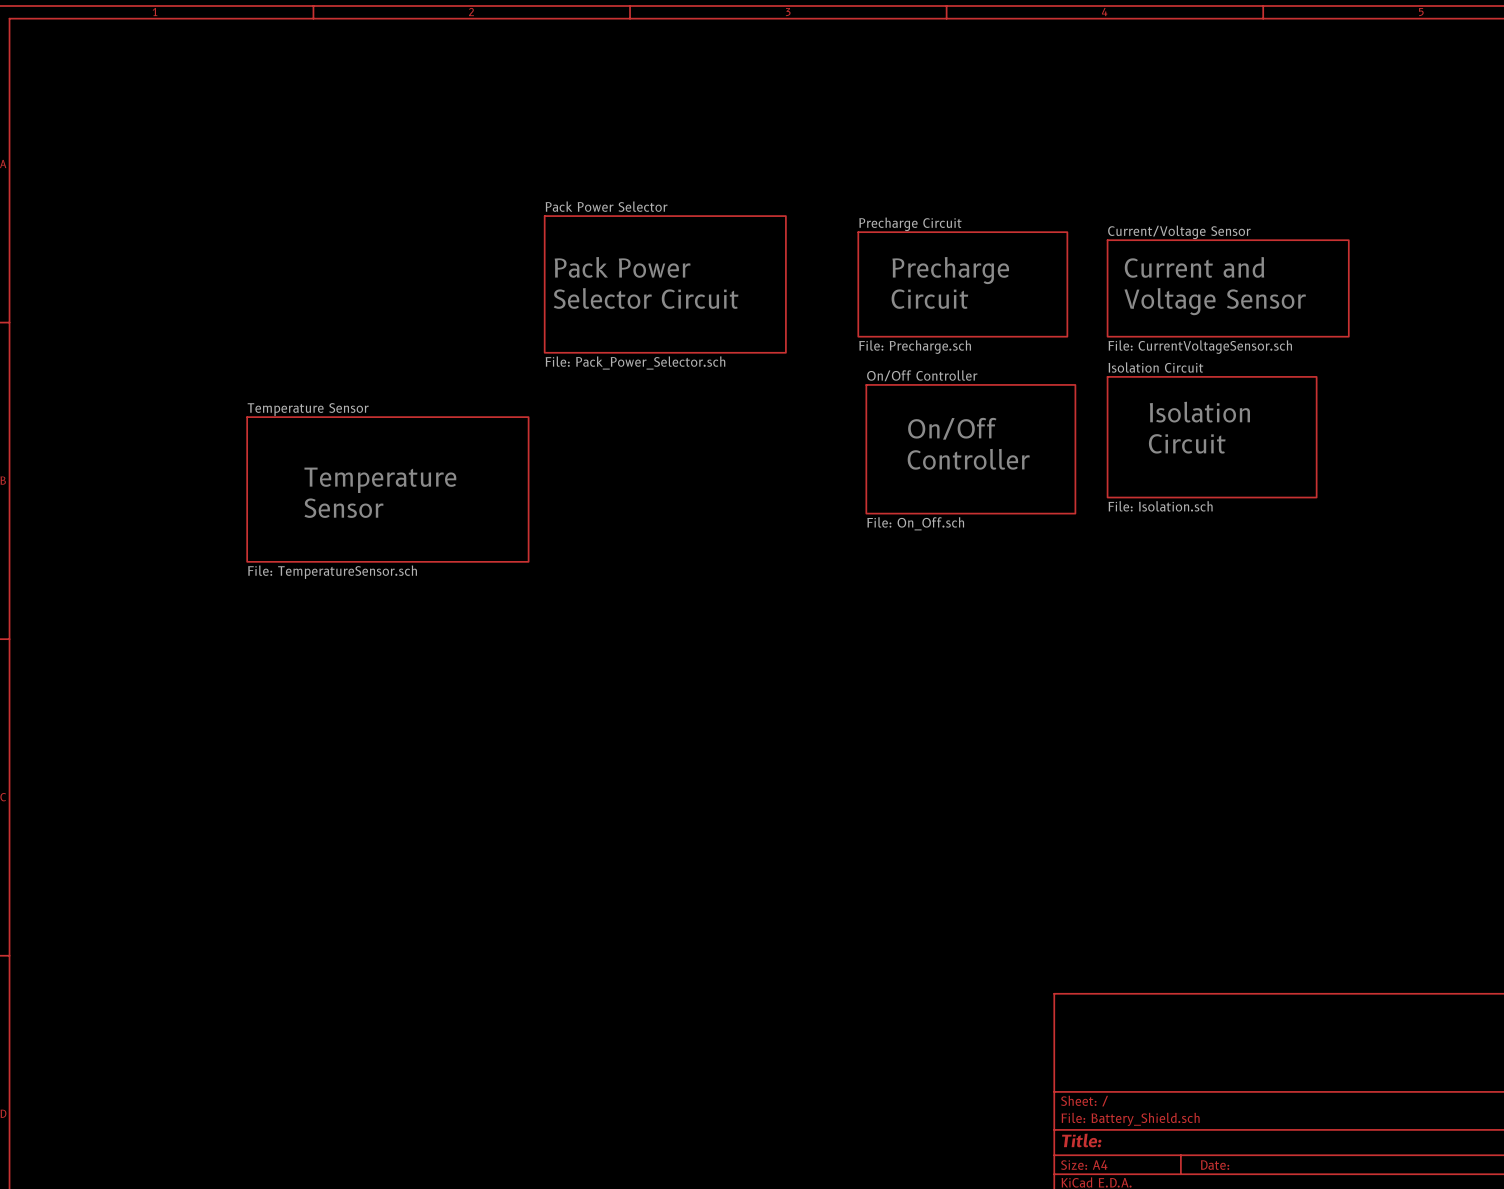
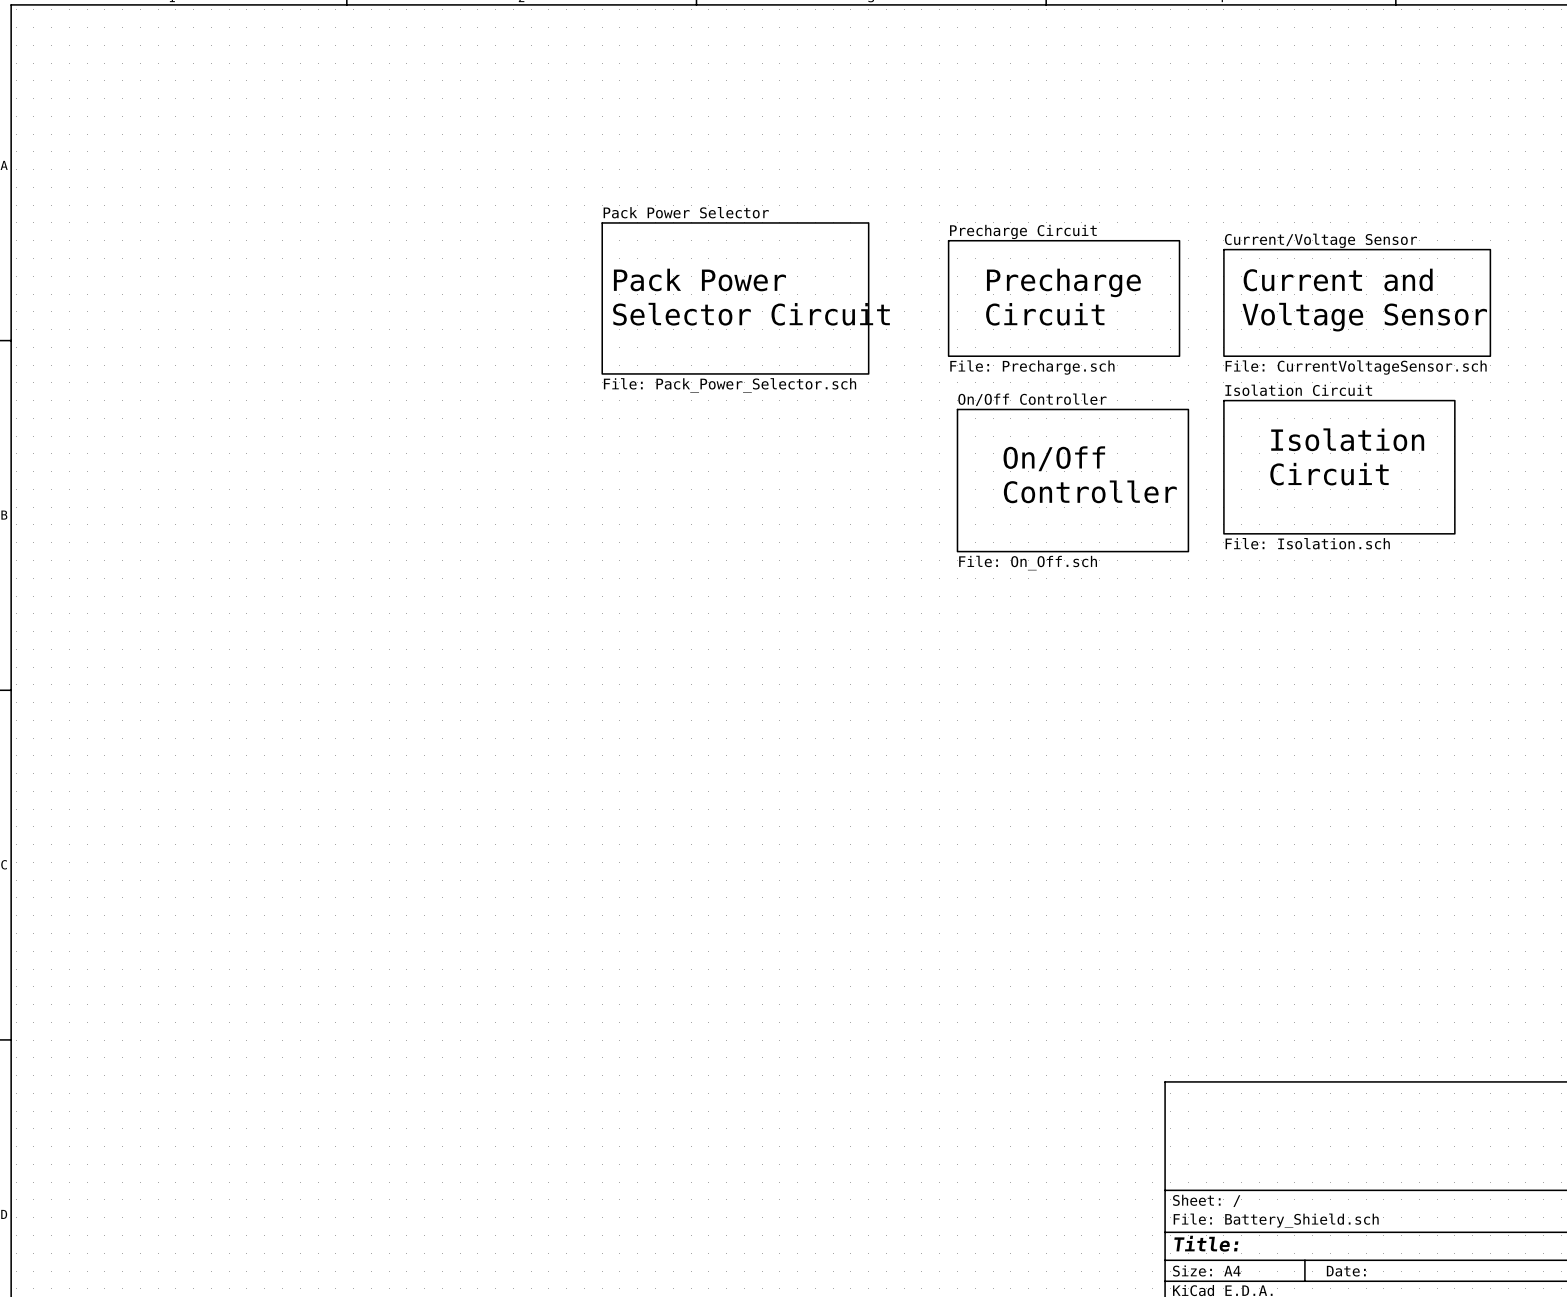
text: Temperature (380, 480) -> none
sheet Temperature Sensor: File: TemperatureSensor.sch (387, 489) -> none
text: Sensor (343, 508) -> none

